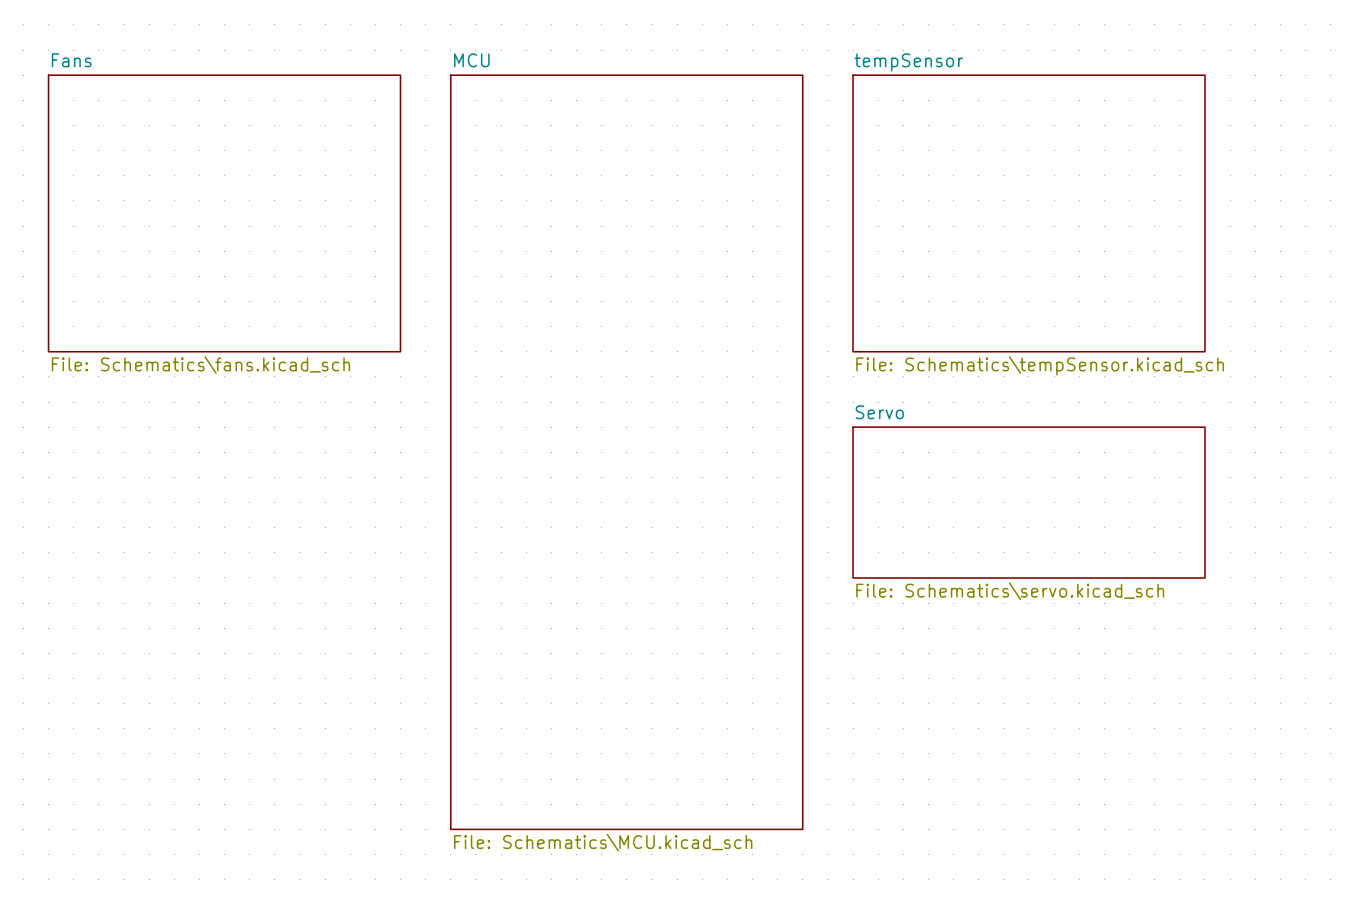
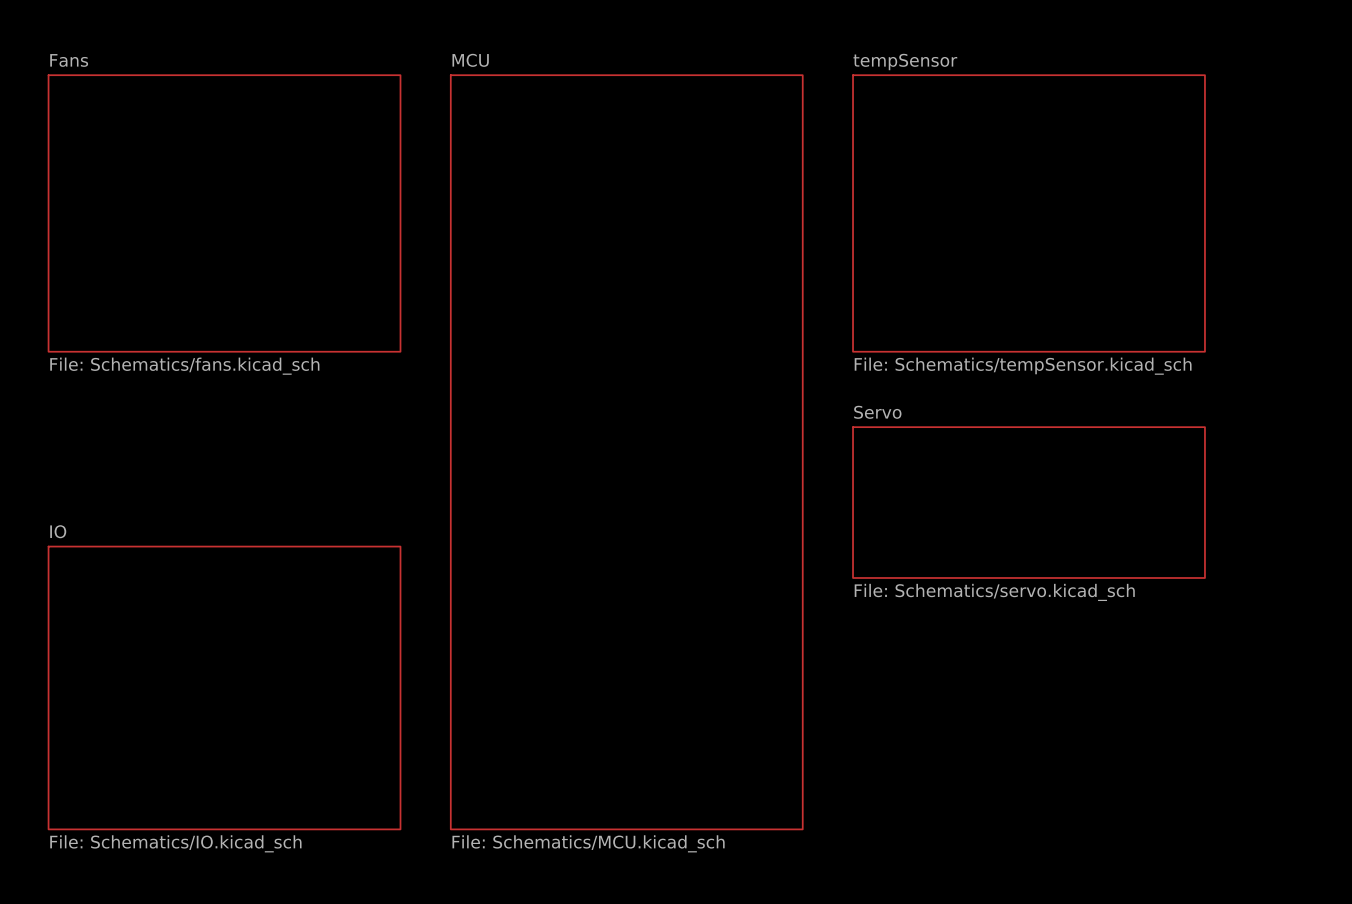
sheet Fans value: File: Schematics\fans.kicad_sch (200, 365) -> File: Schematics/fans.kicad_sch (184, 366)
sheet tempSensor value: File: Schematics\tempSensor.kicad_sch (1040, 365) -> File: Schematics/tempSensor.kicad_sch (1023, 366)
sheet Servo value: File: Schematics\servo.kicad_sch (1010, 591) -> File: Schematics/servo.kicad_sch (994, 592)
sheet IO: none -> File: Schematics/IO.kicad_sch (224, 687)
sheet MCU value: File: Schematics\MCU.kicad_sch (603, 842) -> File: Schematics/MCU.kicad_sch (588, 843)

